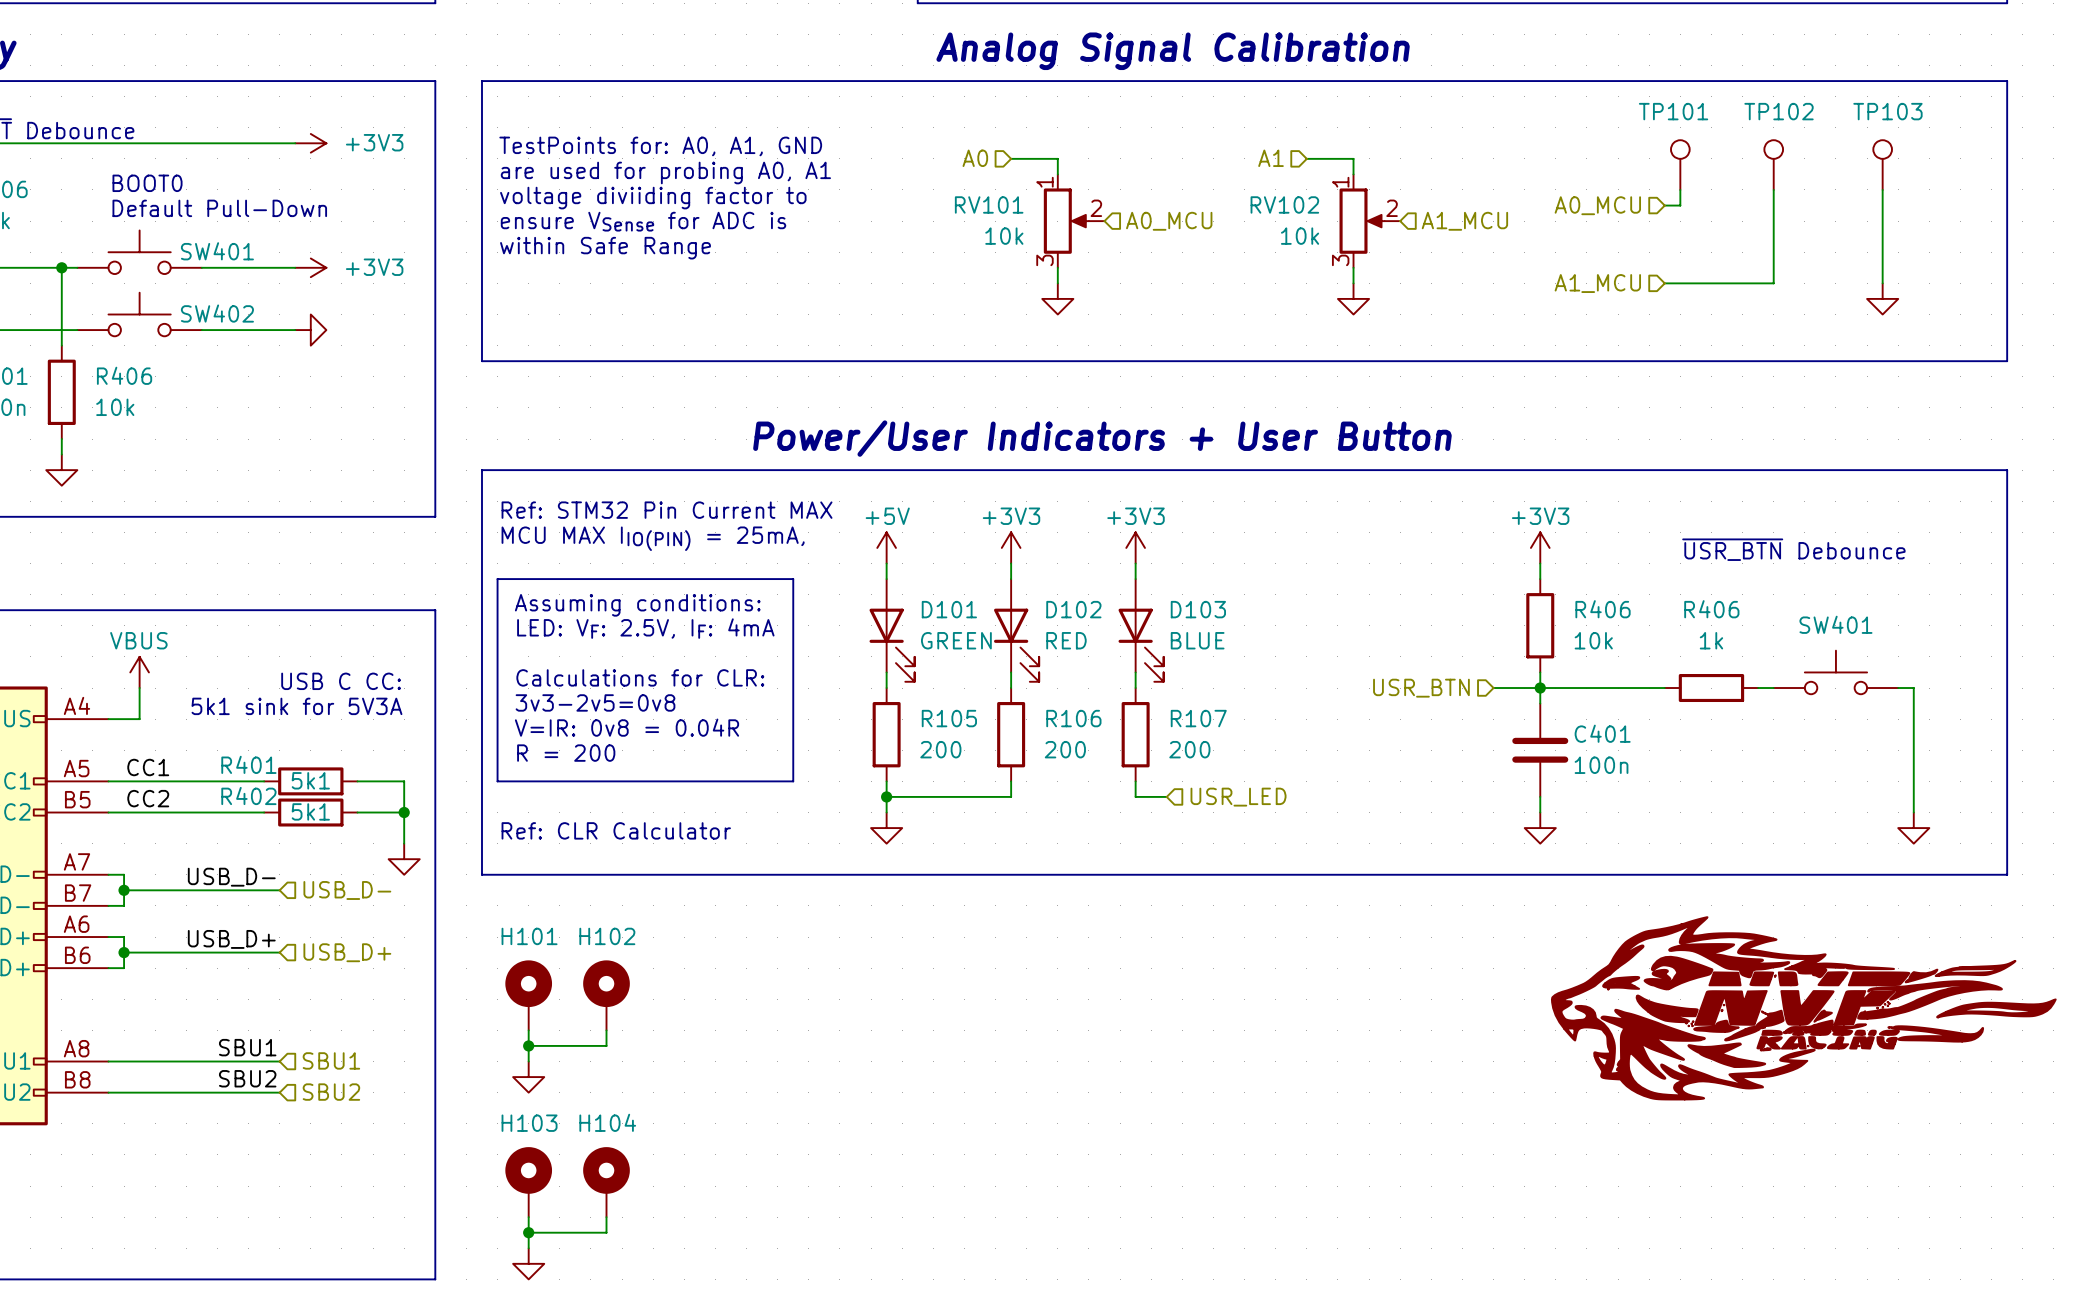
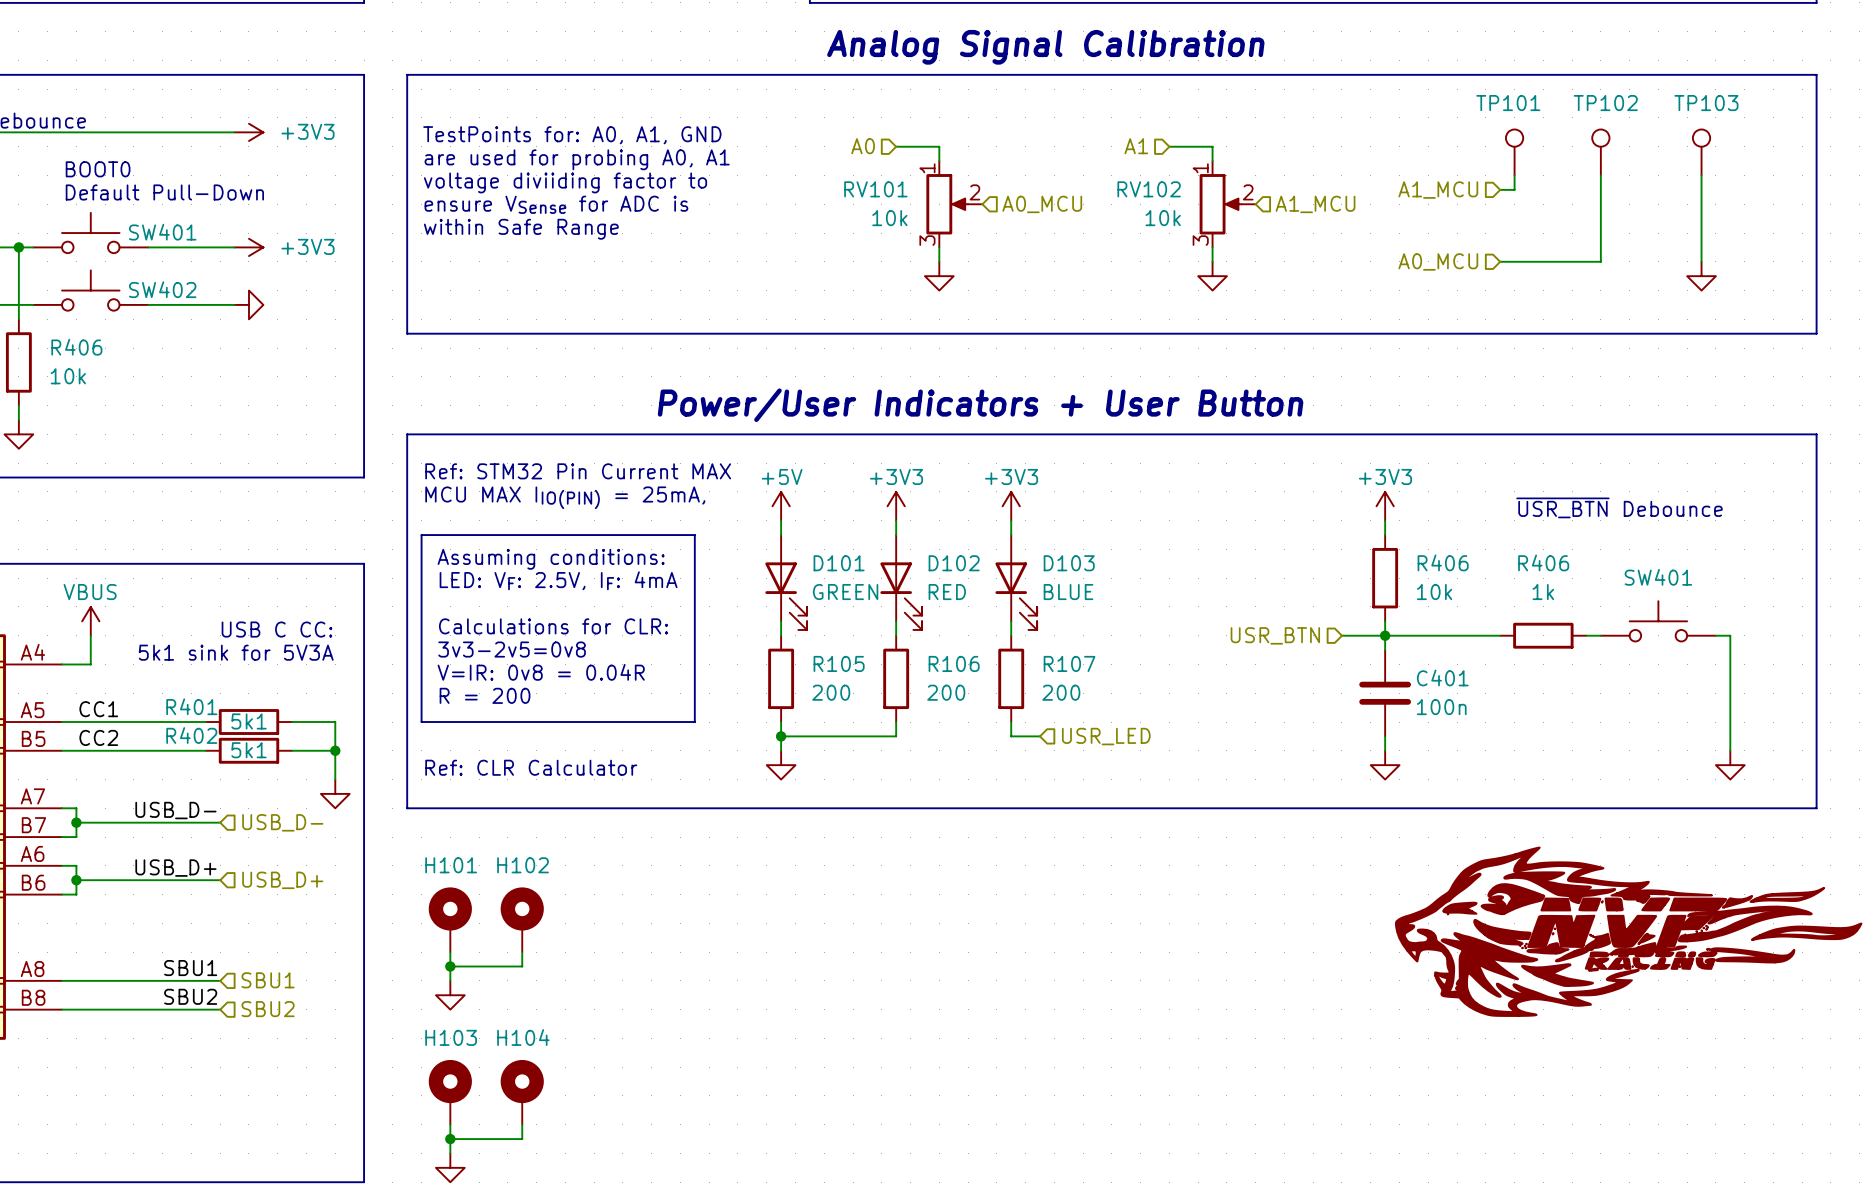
hierarchical label: A0_MCU (1597, 205) -> A1_MCU (1438, 190)
hierarchical label: A1_MCU (1597, 283) -> A0_MCU (1438, 261)

